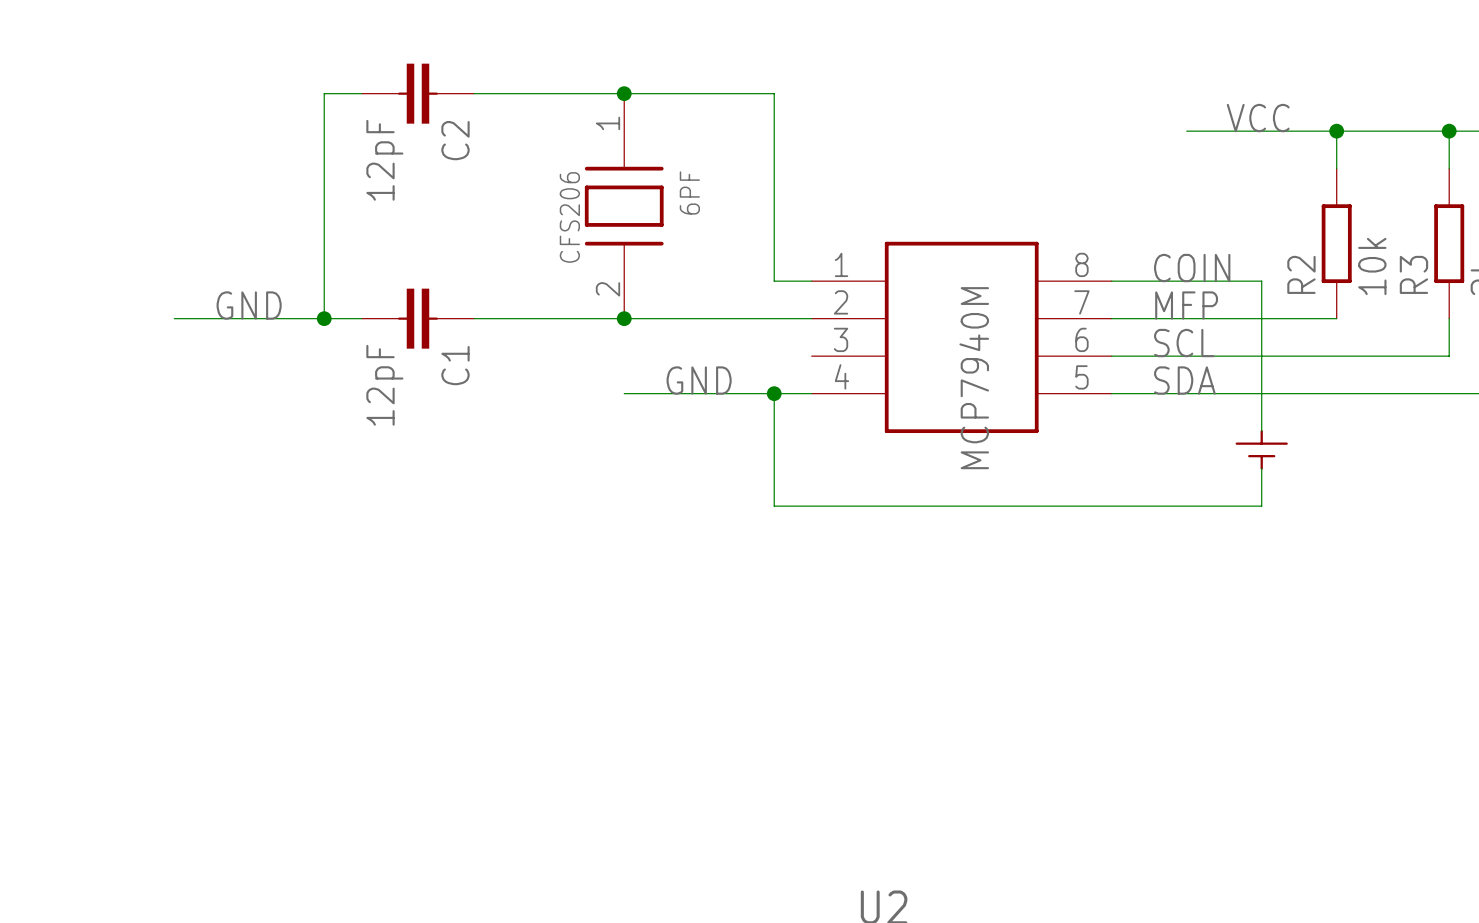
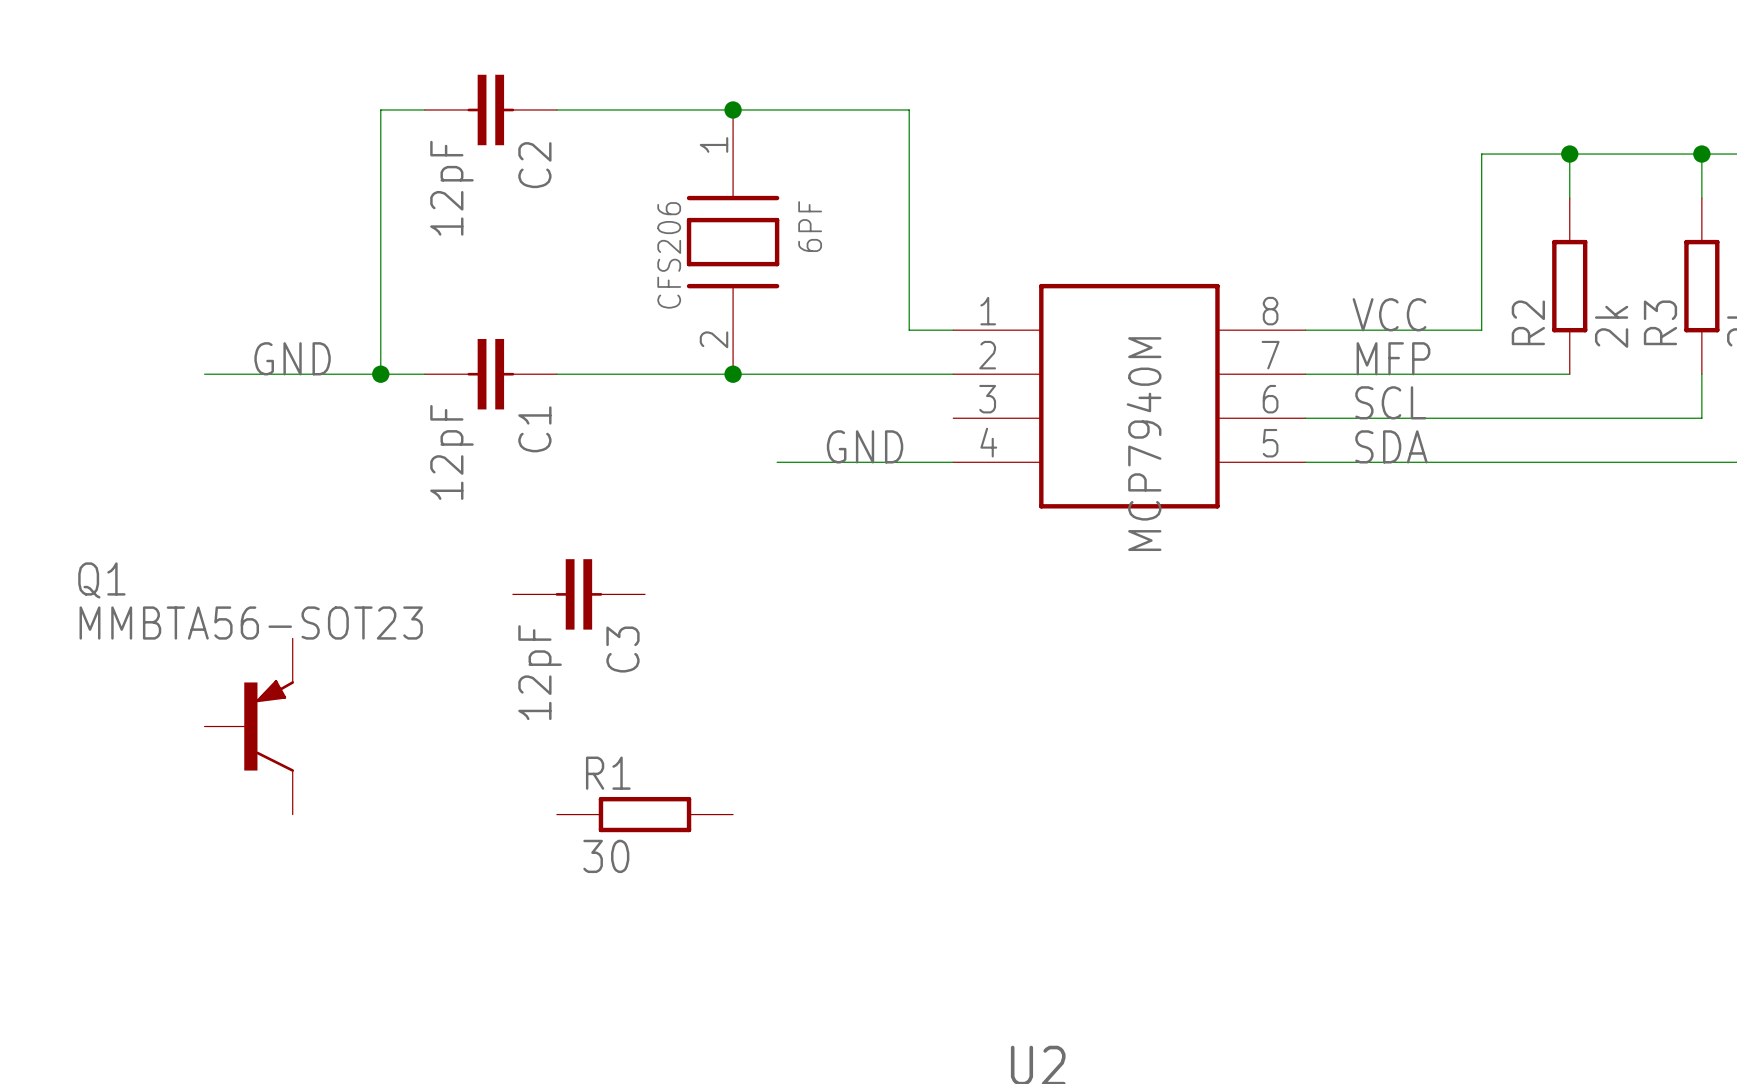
label: VCC (1258, 118) -> none
wire: (1186, 131) (1261, 131) -> (1481, 330) (1481, 154)
R2 value: 10k (1372, 266) -> 2k (1611, 326)
label: COIN (1192, 268) -> VCC (1389, 314)
wire: (1261, 281) (1261, 431) -> none
label position: GND (699, 380) -> GND (865, 446)
wire: (624, 393) (661, 393) -> none
wire: (774, 393) (774, 506) (1261, 506) (1261, 468) -> none
junction: (774, 393) -> none
part: (1261, 449) -> none
C3: none -> 12pF (578, 594)
Q1: none -> MMBTA56-SOT23 (249, 726)
R1: none -> 30 (644, 814)

